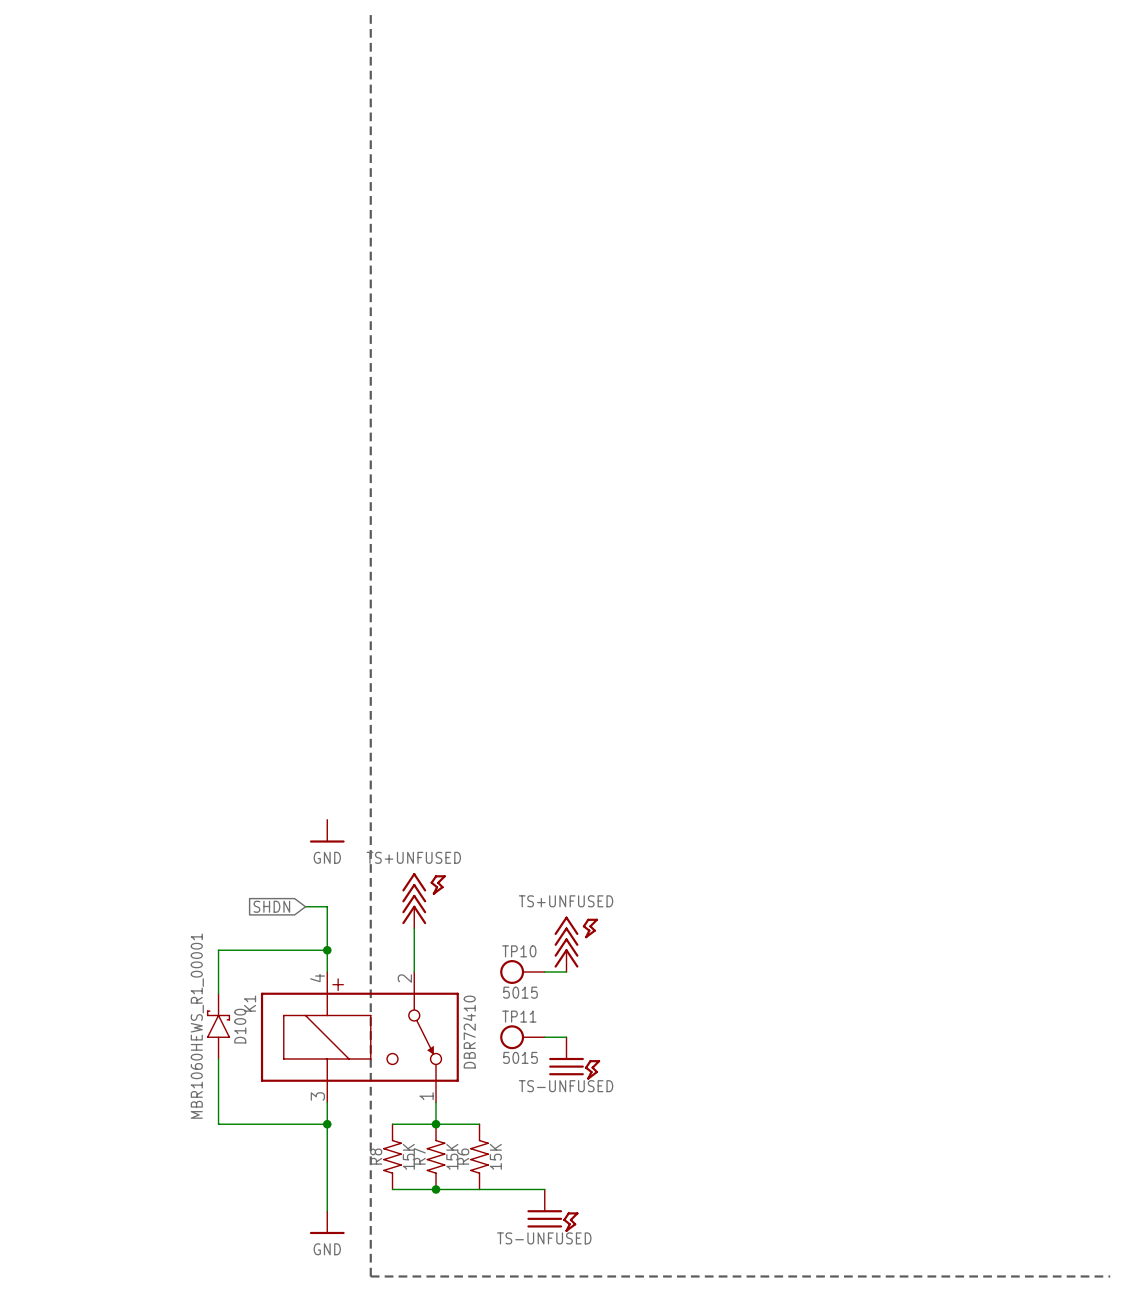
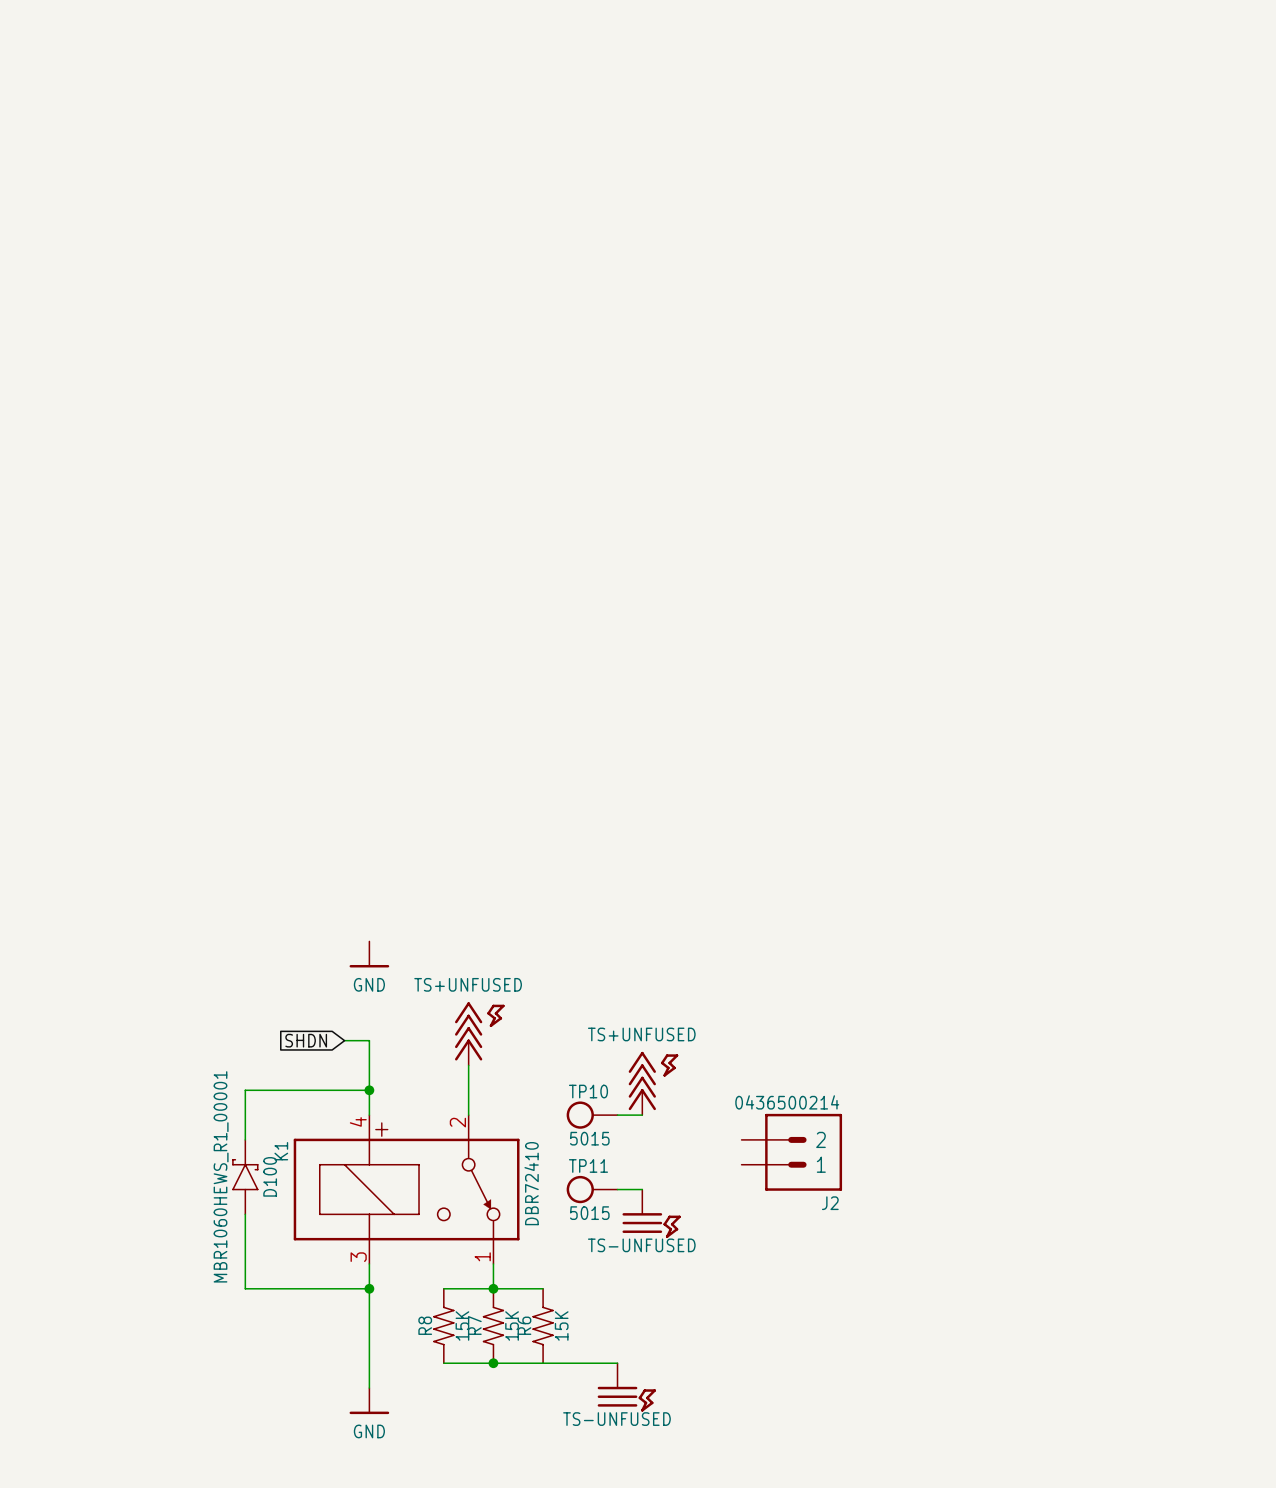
line: (370, 15) (370, 1276) (1110, 1276) -> none
J2: none -> (791, 1152)

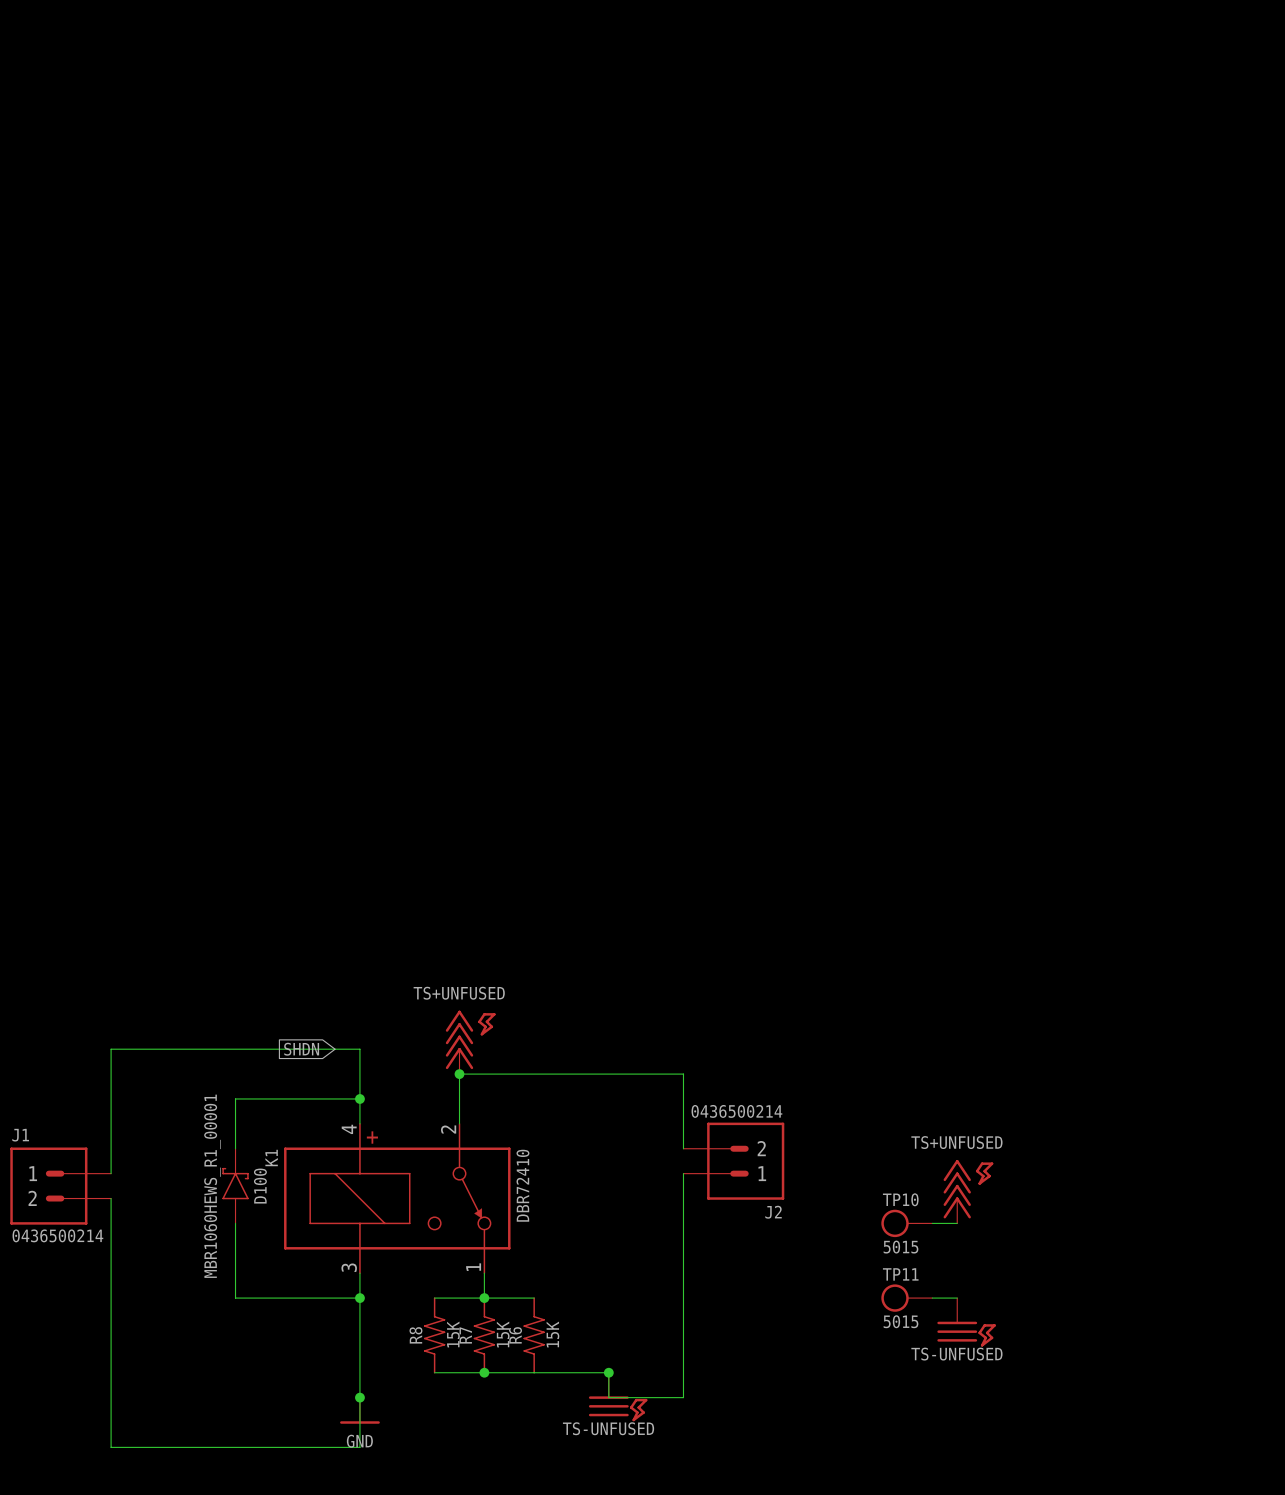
power symbol: GND (369, 954) -> none
wire: none -> (335, 1049) (111, 1049) (111, 1173)
wire: none -> (459, 1074) (683, 1074) (683, 1148)
junction: none -> (459, 1074)
power symbol: TS+UNFUSED (653, 1083) -> none
TP10 position: (592, 1115) -> (906, 1223)
wire: (617, 1115) (642, 1115) -> none
J2 position: (791, 1152) -> (733, 1161)
wire: none -> (683, 1173) (683, 1397) (608, 1397) (608, 1372)
J1: none -> (60, 1186)
power symbol: none -> TS+UNFUSED (968, 1191)
wire: none -> (111, 1198) (111, 1447) (359, 1447) (359, 1397)
TP11 position: (592, 1189) -> (906, 1298)
wire: (617, 1189) (642, 1189) -> none
power symbol: TS-UNFUSED (651, 1213) -> none
wire: none -> (932, 1223) (957, 1223)
wire: none -> (932, 1298) (957, 1298)
power symbol: none -> TS-UNFUSED (966, 1322)
junction: none -> (608, 1372)
junction: none -> (359, 1397)

